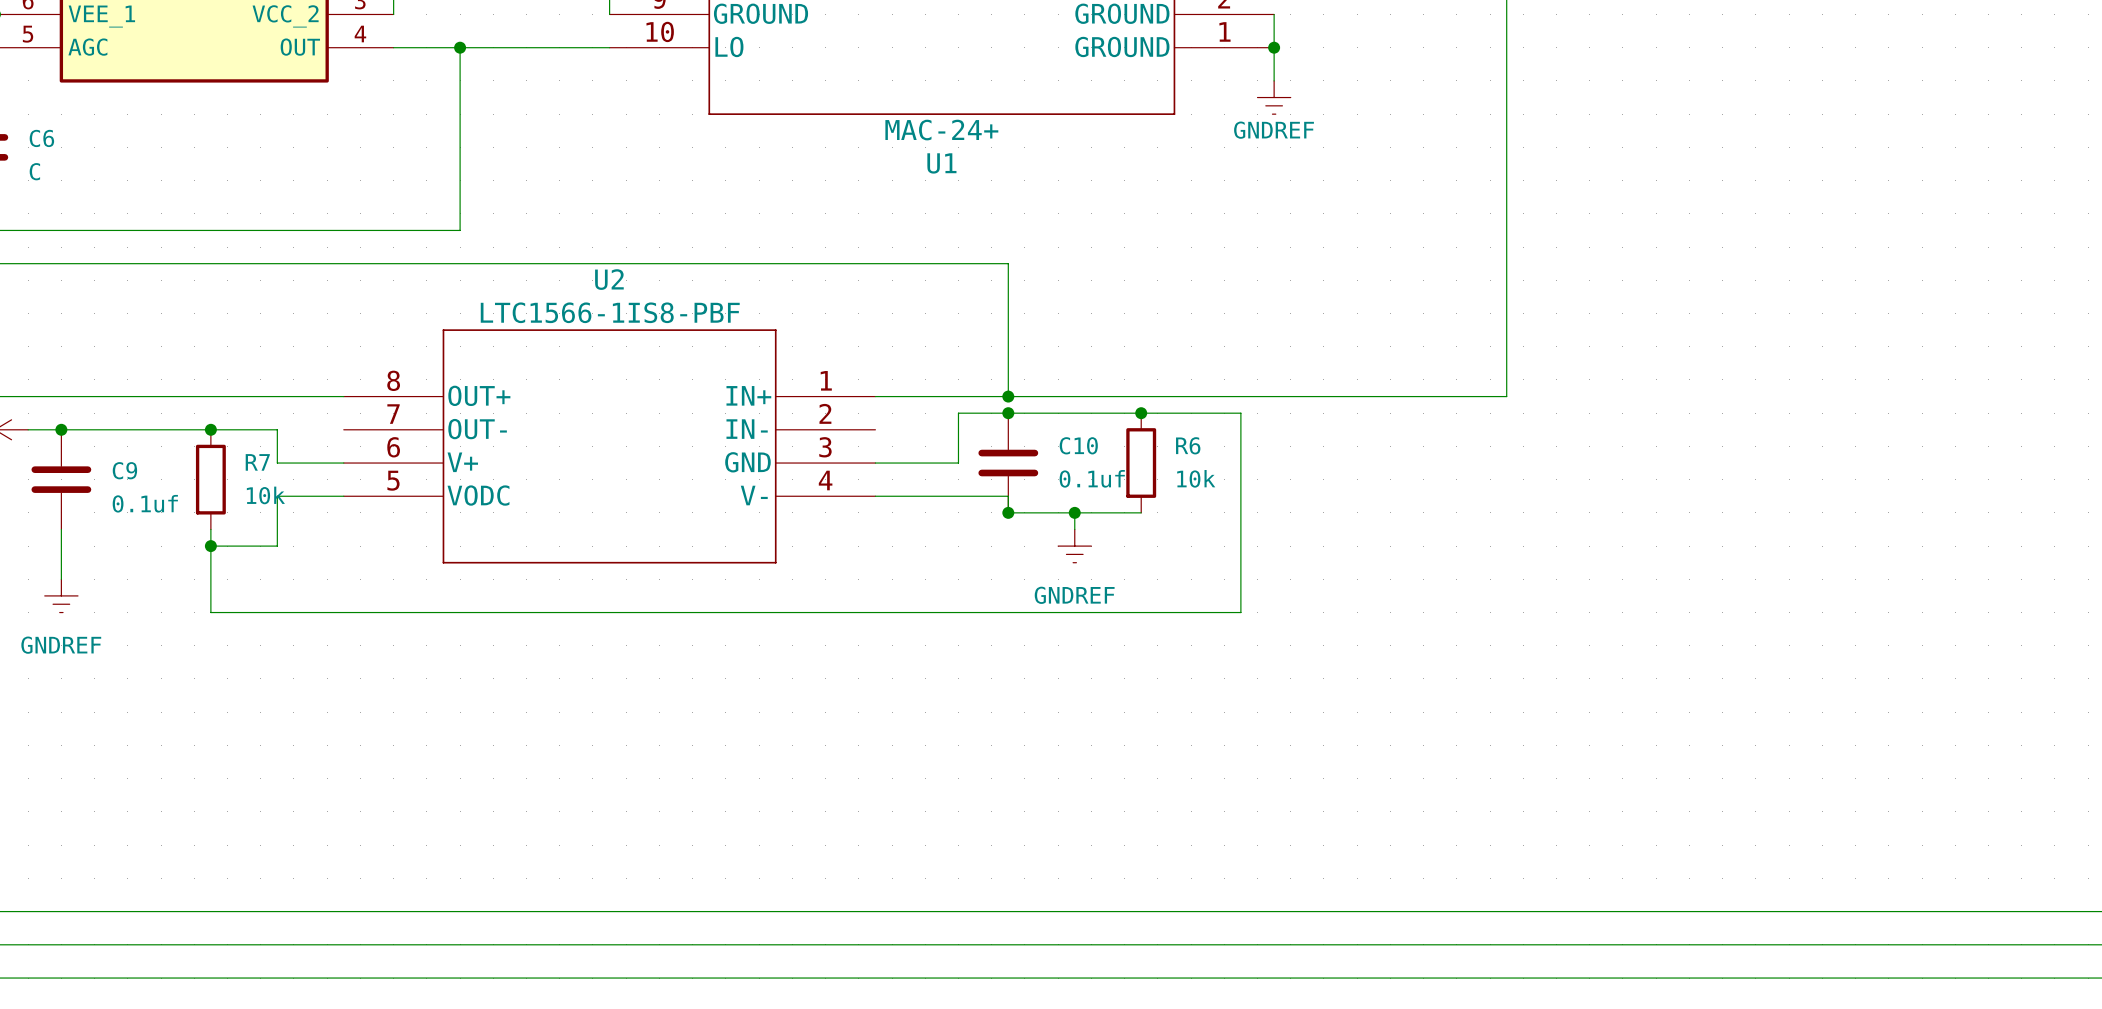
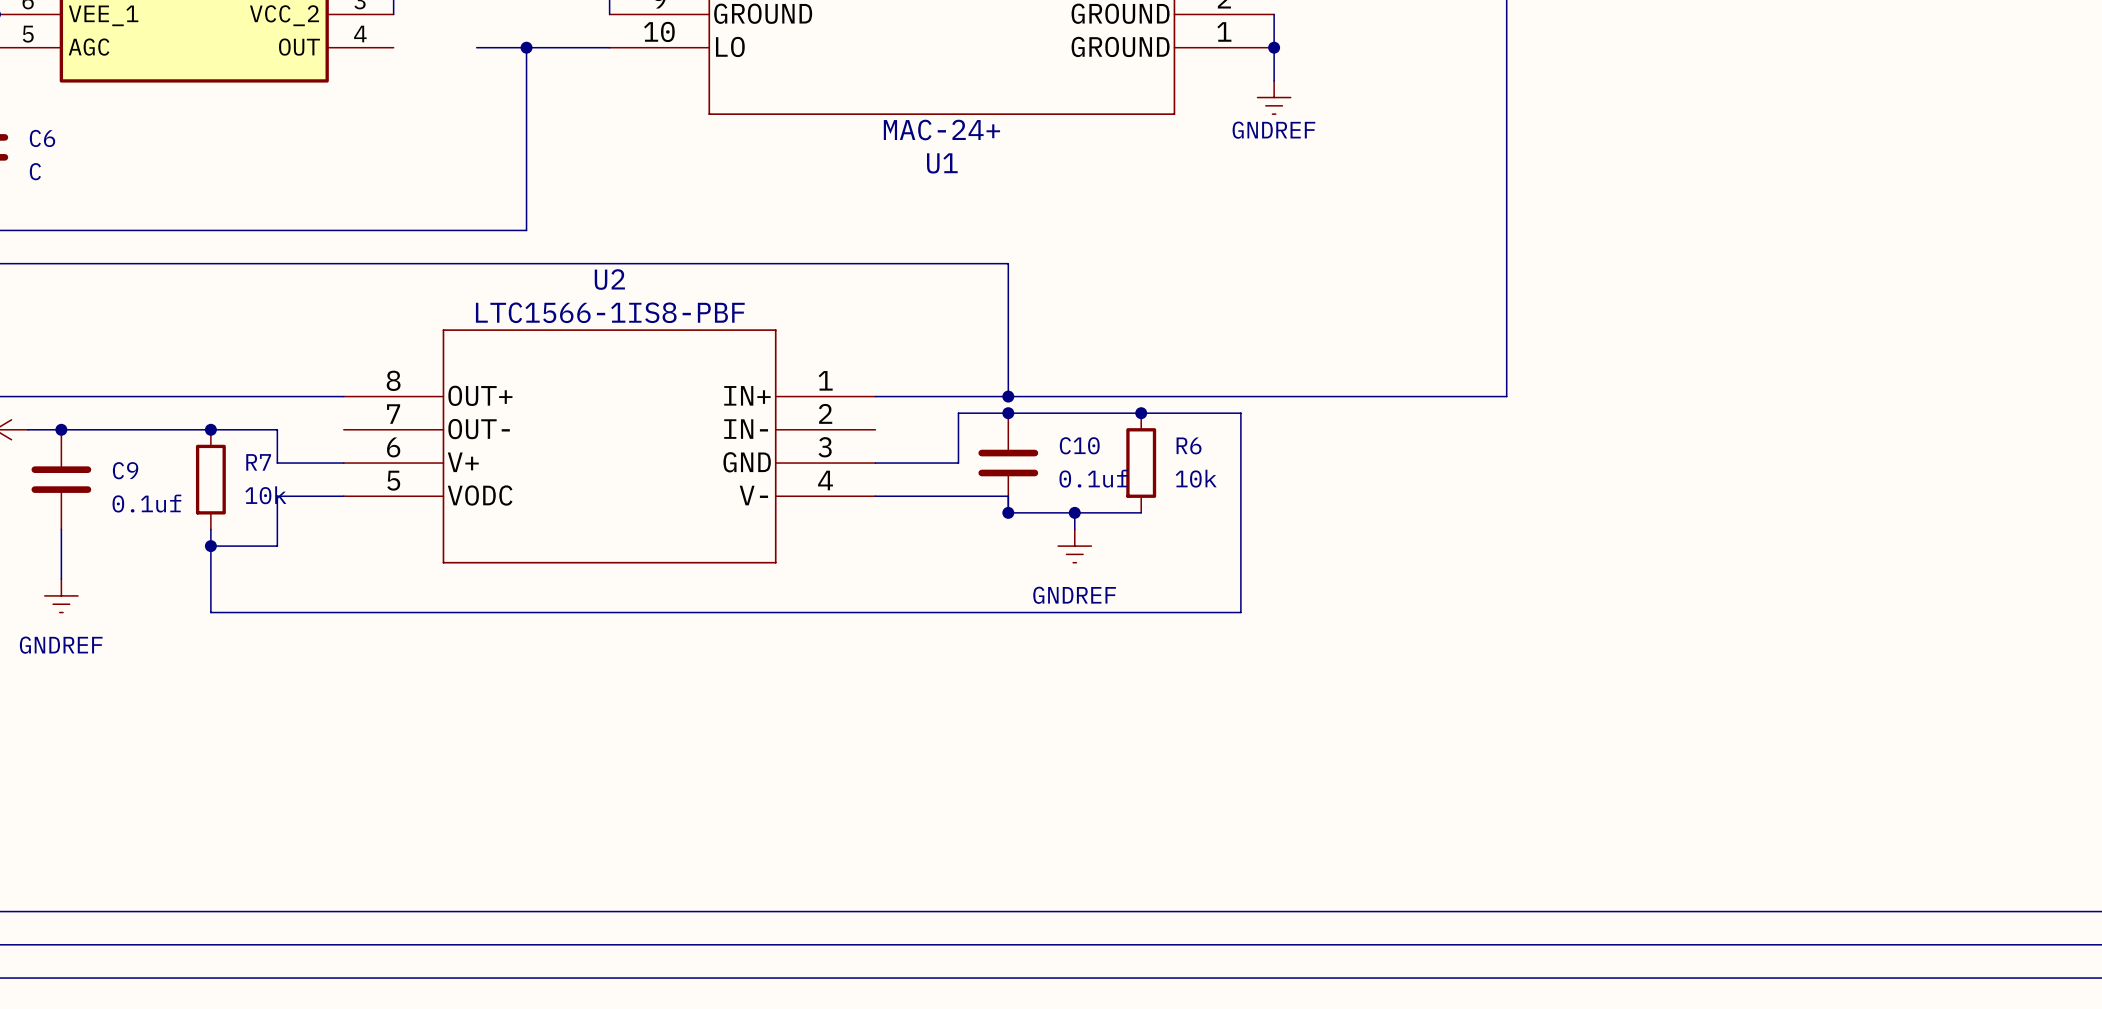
wire: (393, 47) (476, 47) -> none
wire: (460, 47) (460, 230) -> (526, 47) (526, 230) (460, 230)
junction position: (460, 47) -> (526, 47)

